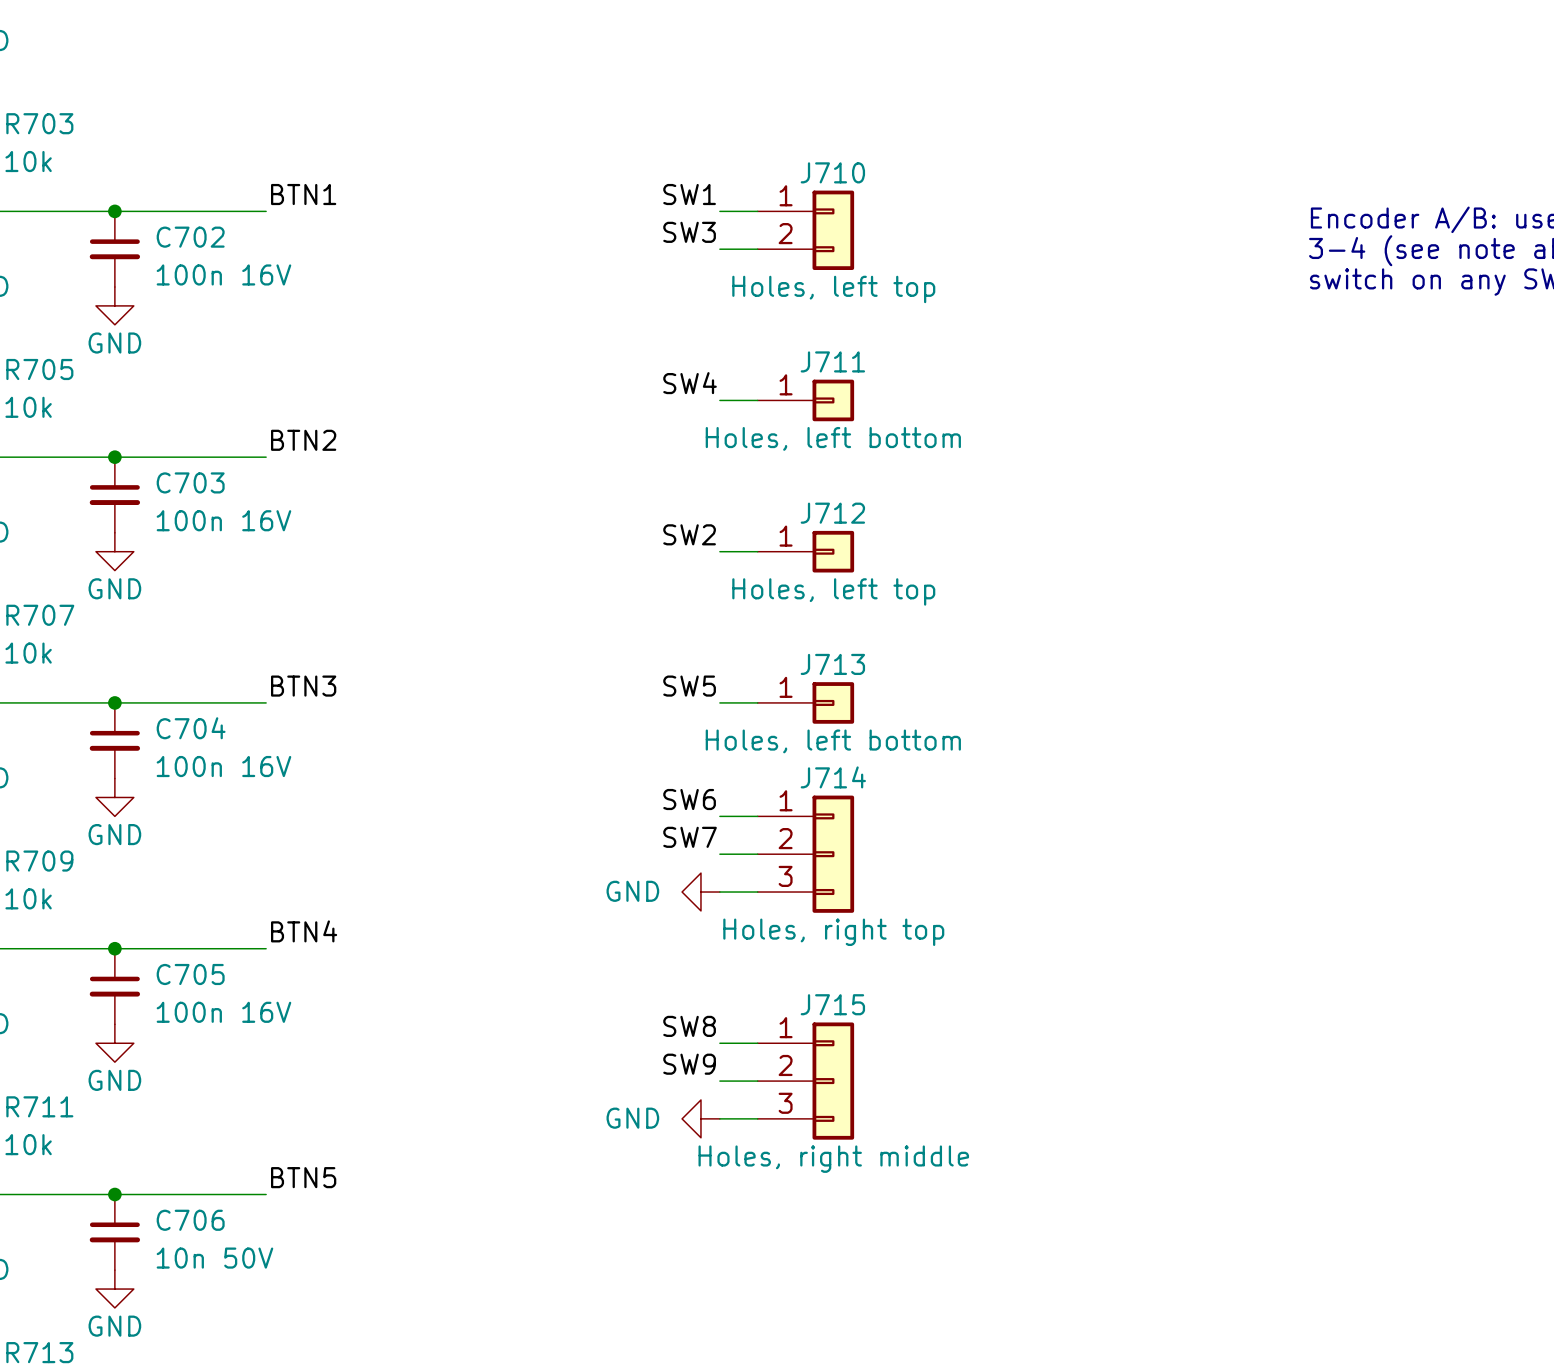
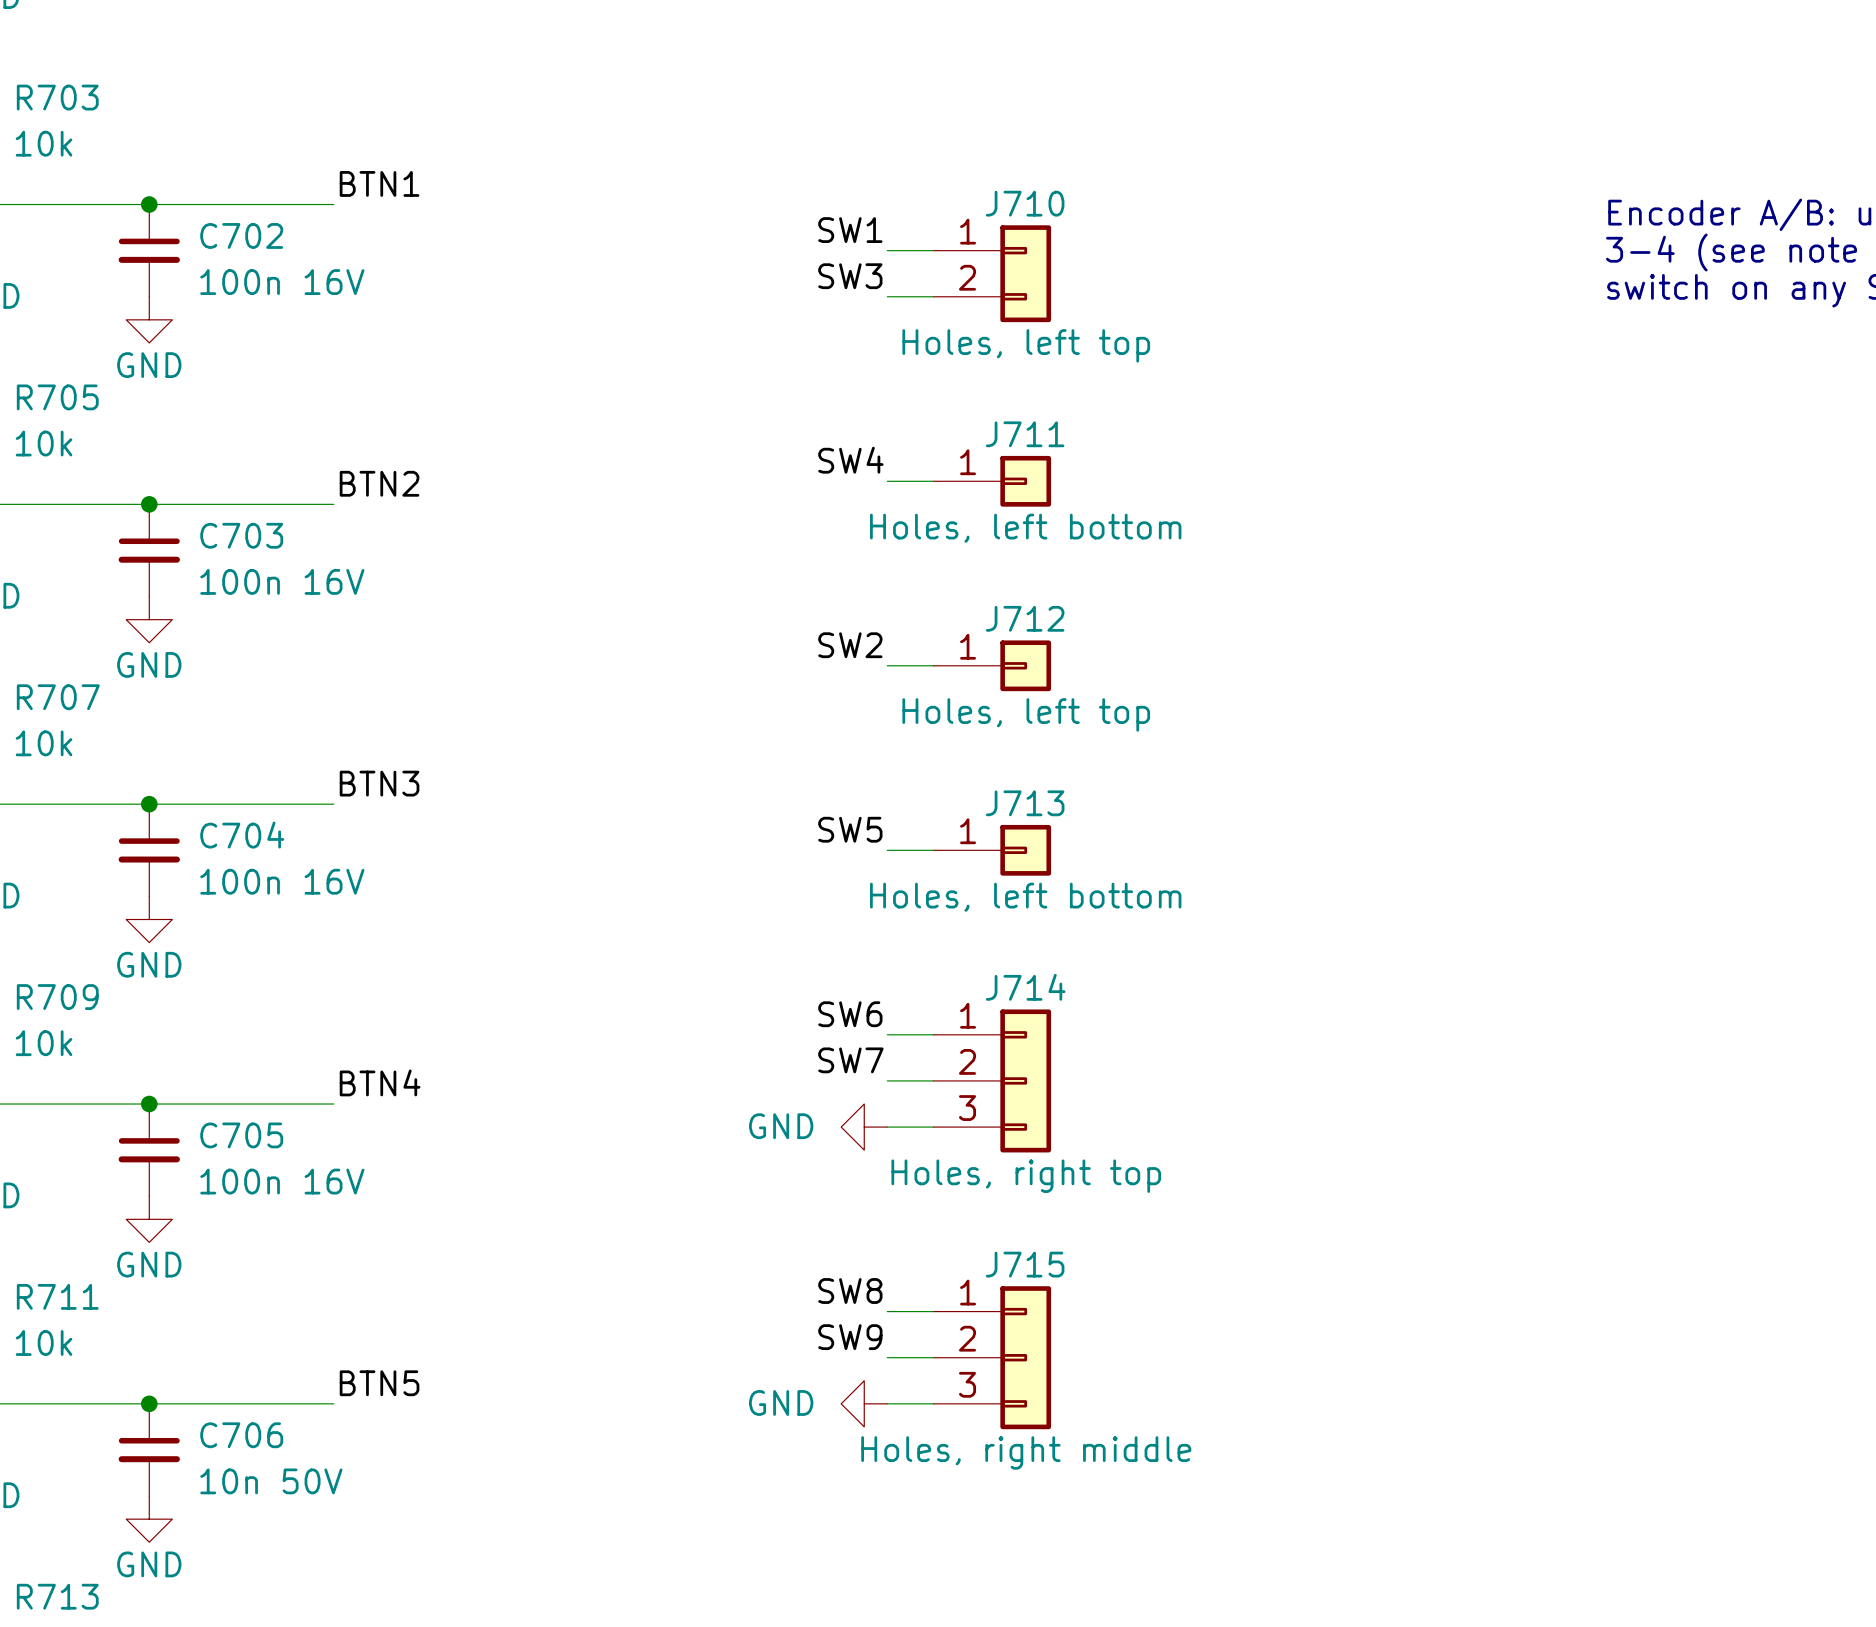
label: SW1 (689, 194) -> none
wire: (719, 211) (757, 211) -> none
J710 position: (805, 230) -> (992, 273)
label: SW3 (689, 232) -> SW1 (850, 230)
label: none -> SW3 (850, 276)
label position: SW4 (690, 383) -> SW4 (850, 460)
wire: (719, 400) (757, 400) -> (887, 296) (933, 296)
J711 position: (805, 400) -> (992, 481)
label position: SW2 (689, 534) -> SW2 (850, 645)
wire: (719, 551) (757, 551) -> (887, 481) (933, 481)
J712 position: (805, 551) -> (992, 665)
label position: SW5 (689, 686) -> SW5 (850, 829)
wire: (719, 702) (757, 702) -> (887, 665) (933, 665)
J713 position: (805, 702) -> (992, 850)
label position: SW6 (689, 799) -> SW6 (850, 1014)
wire: (719, 816) (757, 816) -> (887, 1357) (933, 1357)
label position: SW7 (690, 837) -> SW7 (850, 1060)
wire: (719, 854) (757, 854) -> (887, 850) (933, 850)
J714 position: (805, 854) -> (992, 1080)
power symbol: GND (700, 892) -> none
power symbol: none -> GND (864, 1127)
label position: SW8 (689, 1026) -> SW8 (850, 1291)
wire: (719, 1043) (757, 1043) -> (887, 1080) (933, 1080)
label position: SW9 (689, 1064) -> SW9 (850, 1337)
wire: (719, 1081) (757, 1081) -> (887, 1127) (933, 1127)
J715 position: (805, 1081) -> (992, 1357)
power symbol: GND (700, 1118) -> none
power symbol: none -> GND (864, 1403)
wire: none -> (887, 1403) (933, 1403)

